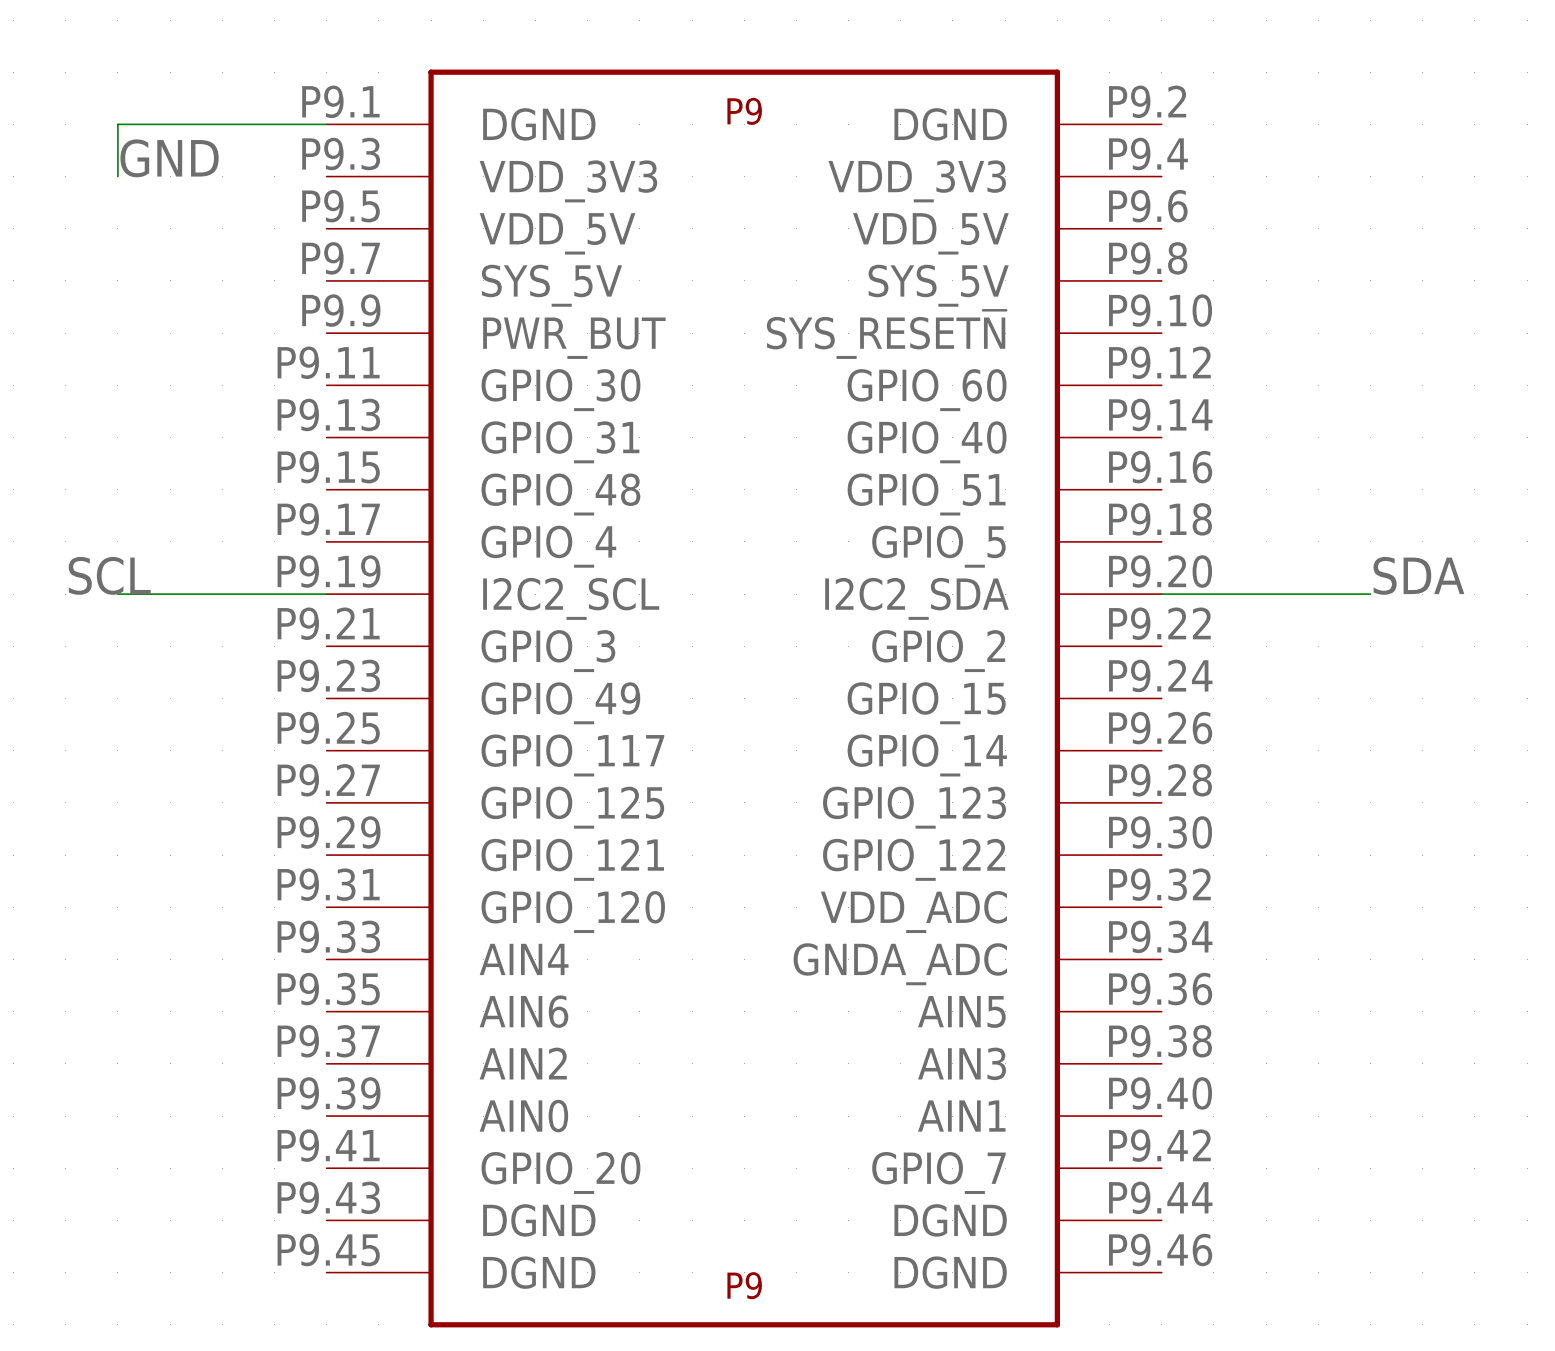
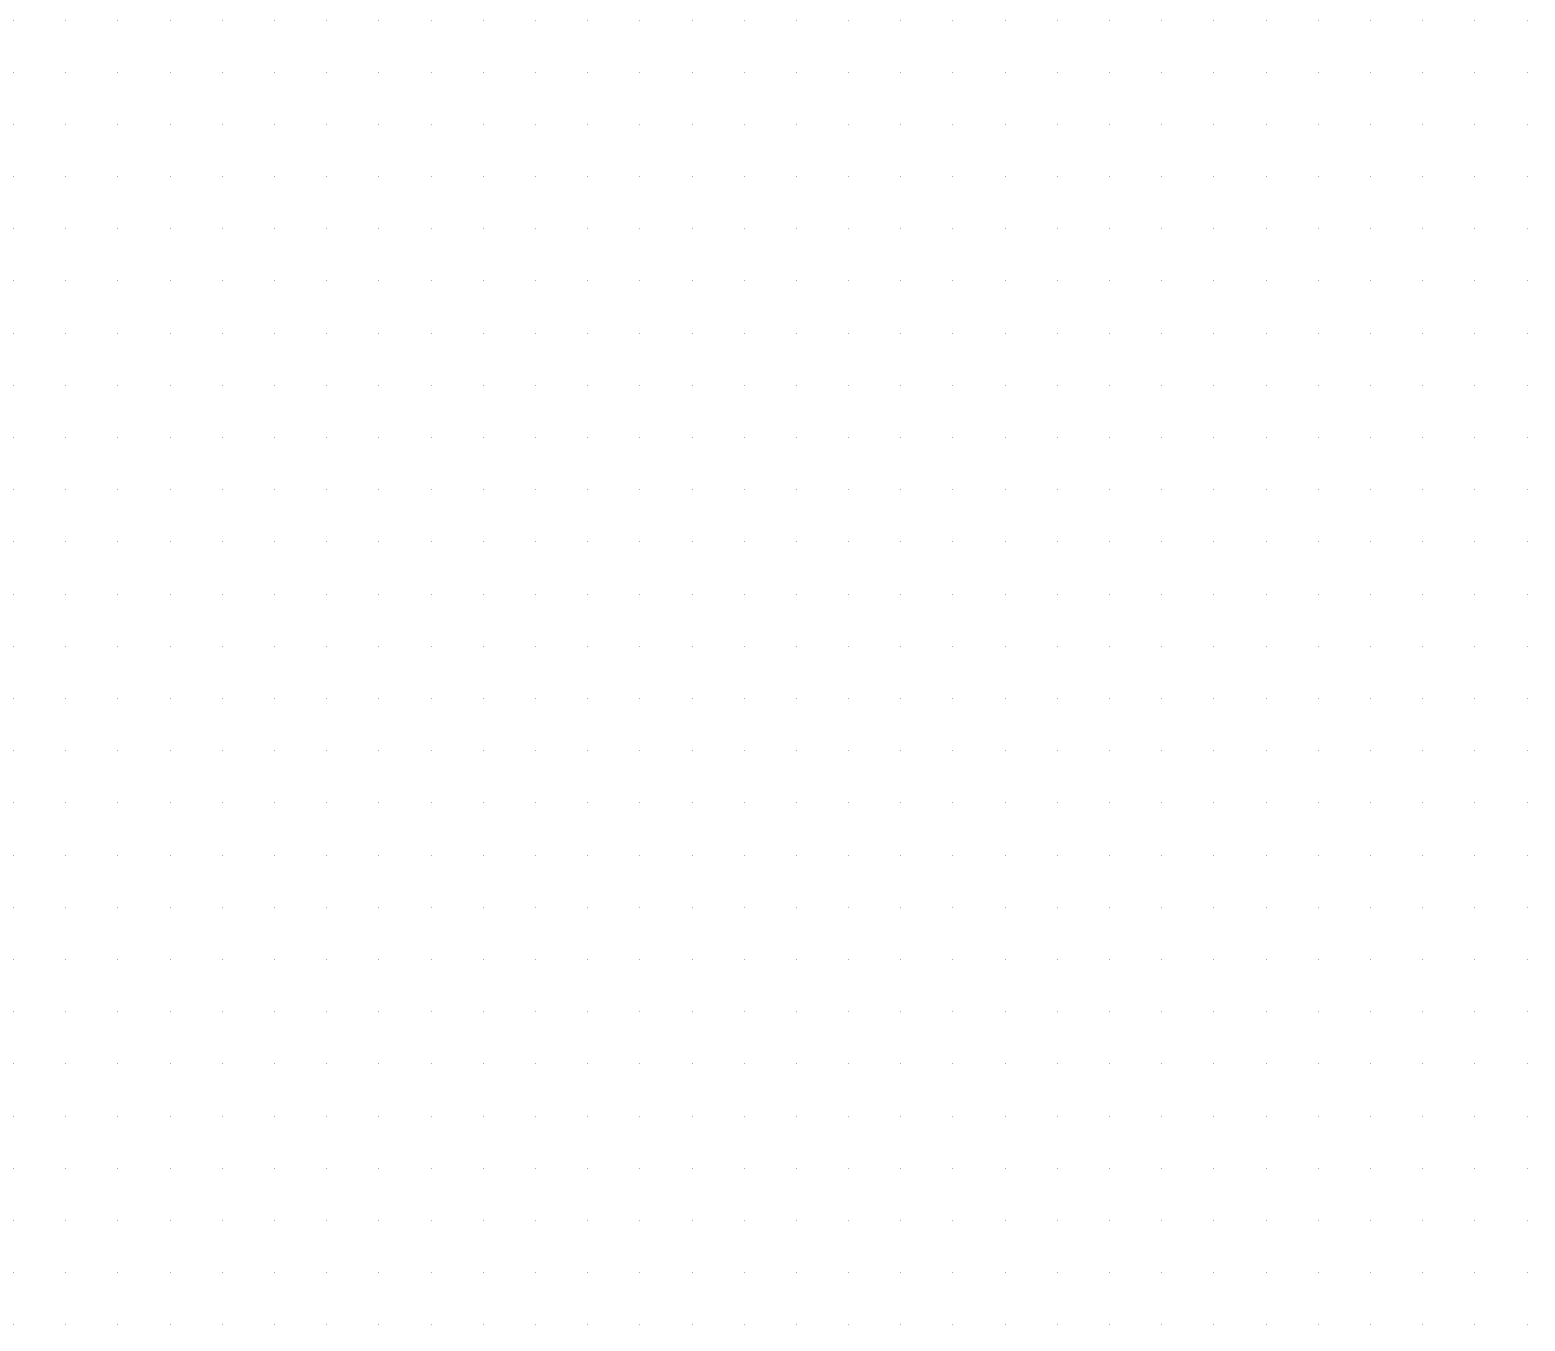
wire: (326, 124) (117, 124) (117, 176) -> none
label: GND (169, 158) -> none
label: SCL (109, 575) -> none
label: SDA (1418, 575) -> none
wire: (117, 594) (326, 594) -> none
wire: (1161, 594) (1370, 594) -> none
part: (744, 698) -> none

